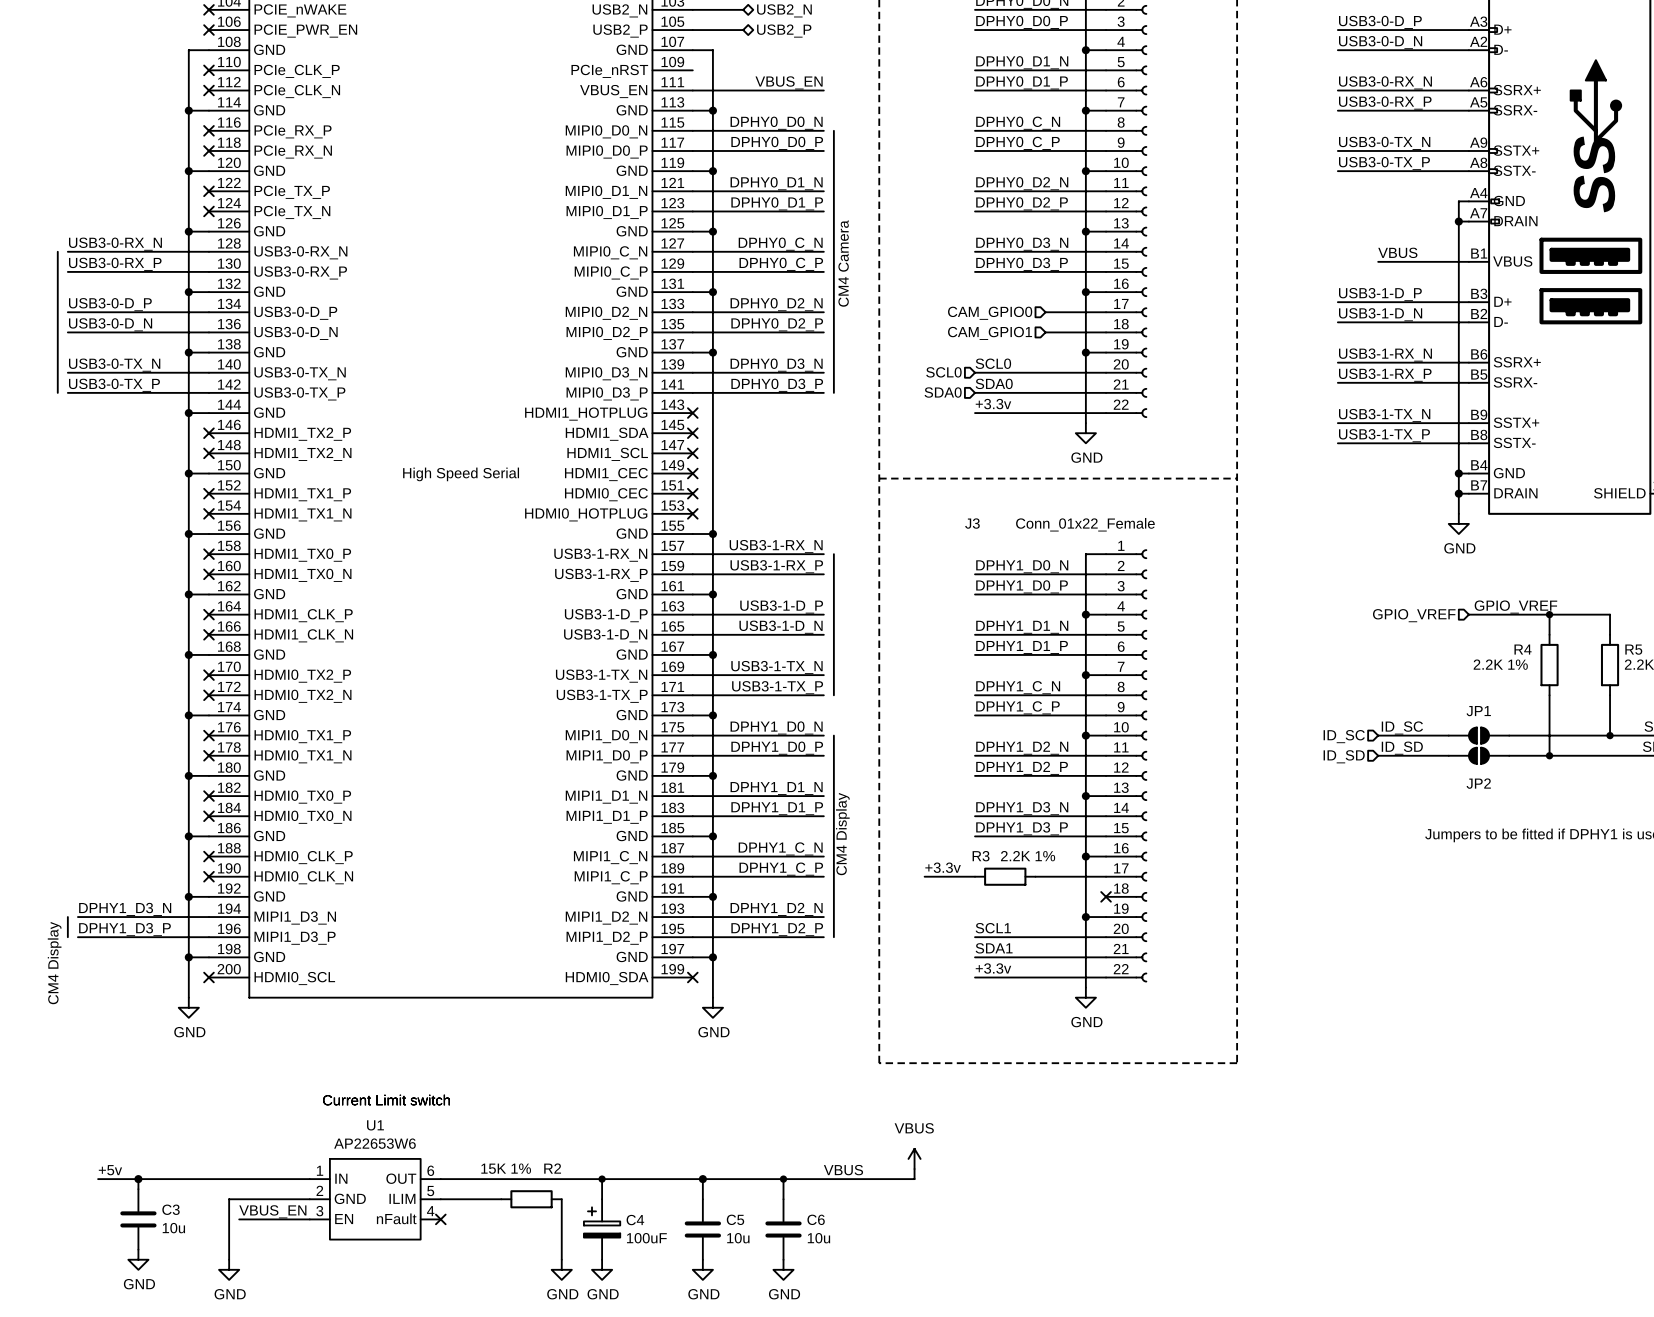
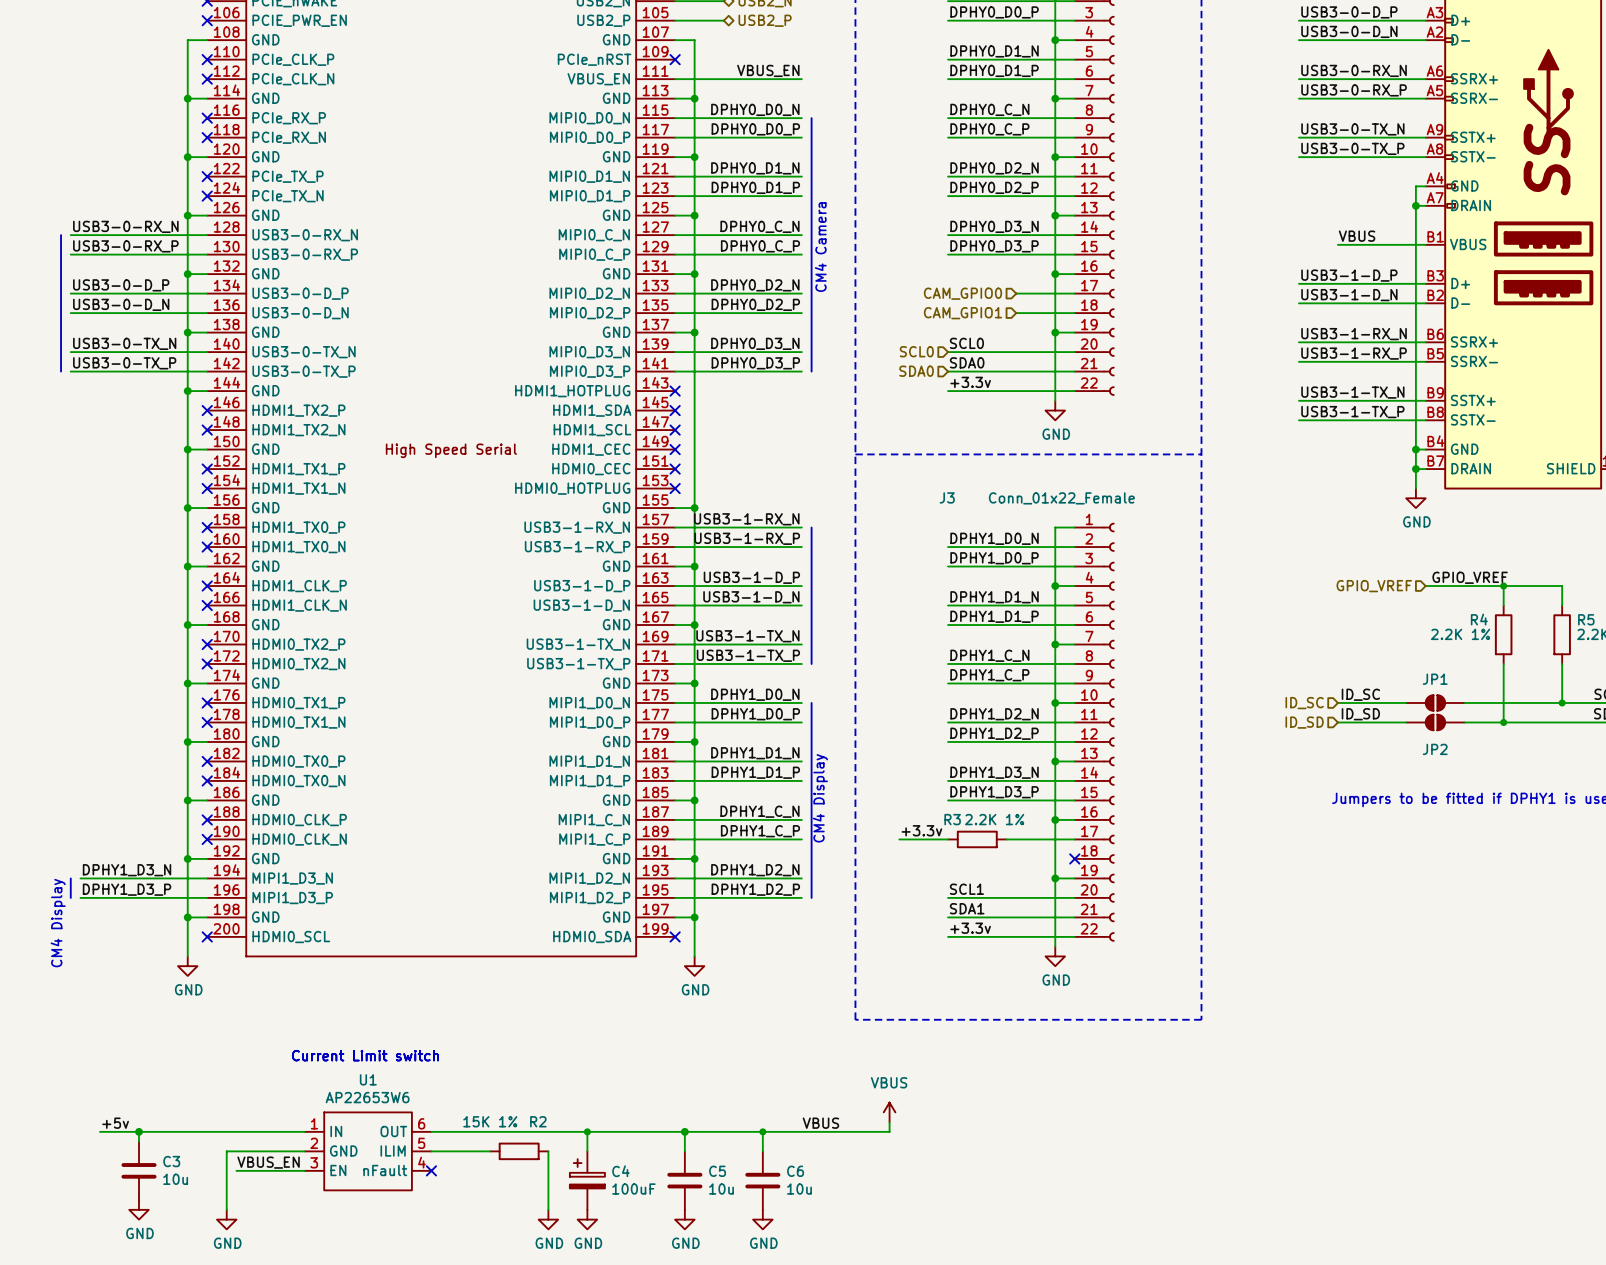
no-connect mark: none -> (675, 59)

